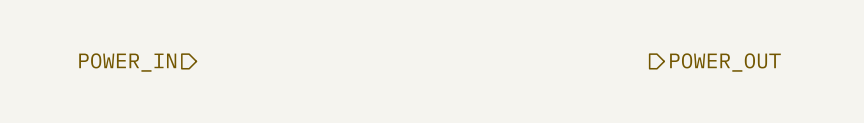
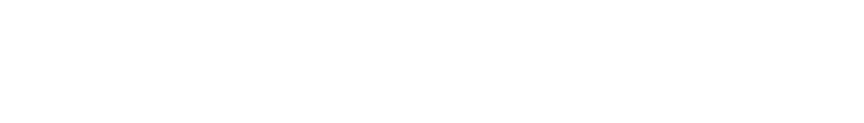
hierarchical label: POWER_IN (127, 62) -> none
hierarchical label: POWER_OUT (725, 62) -> none

